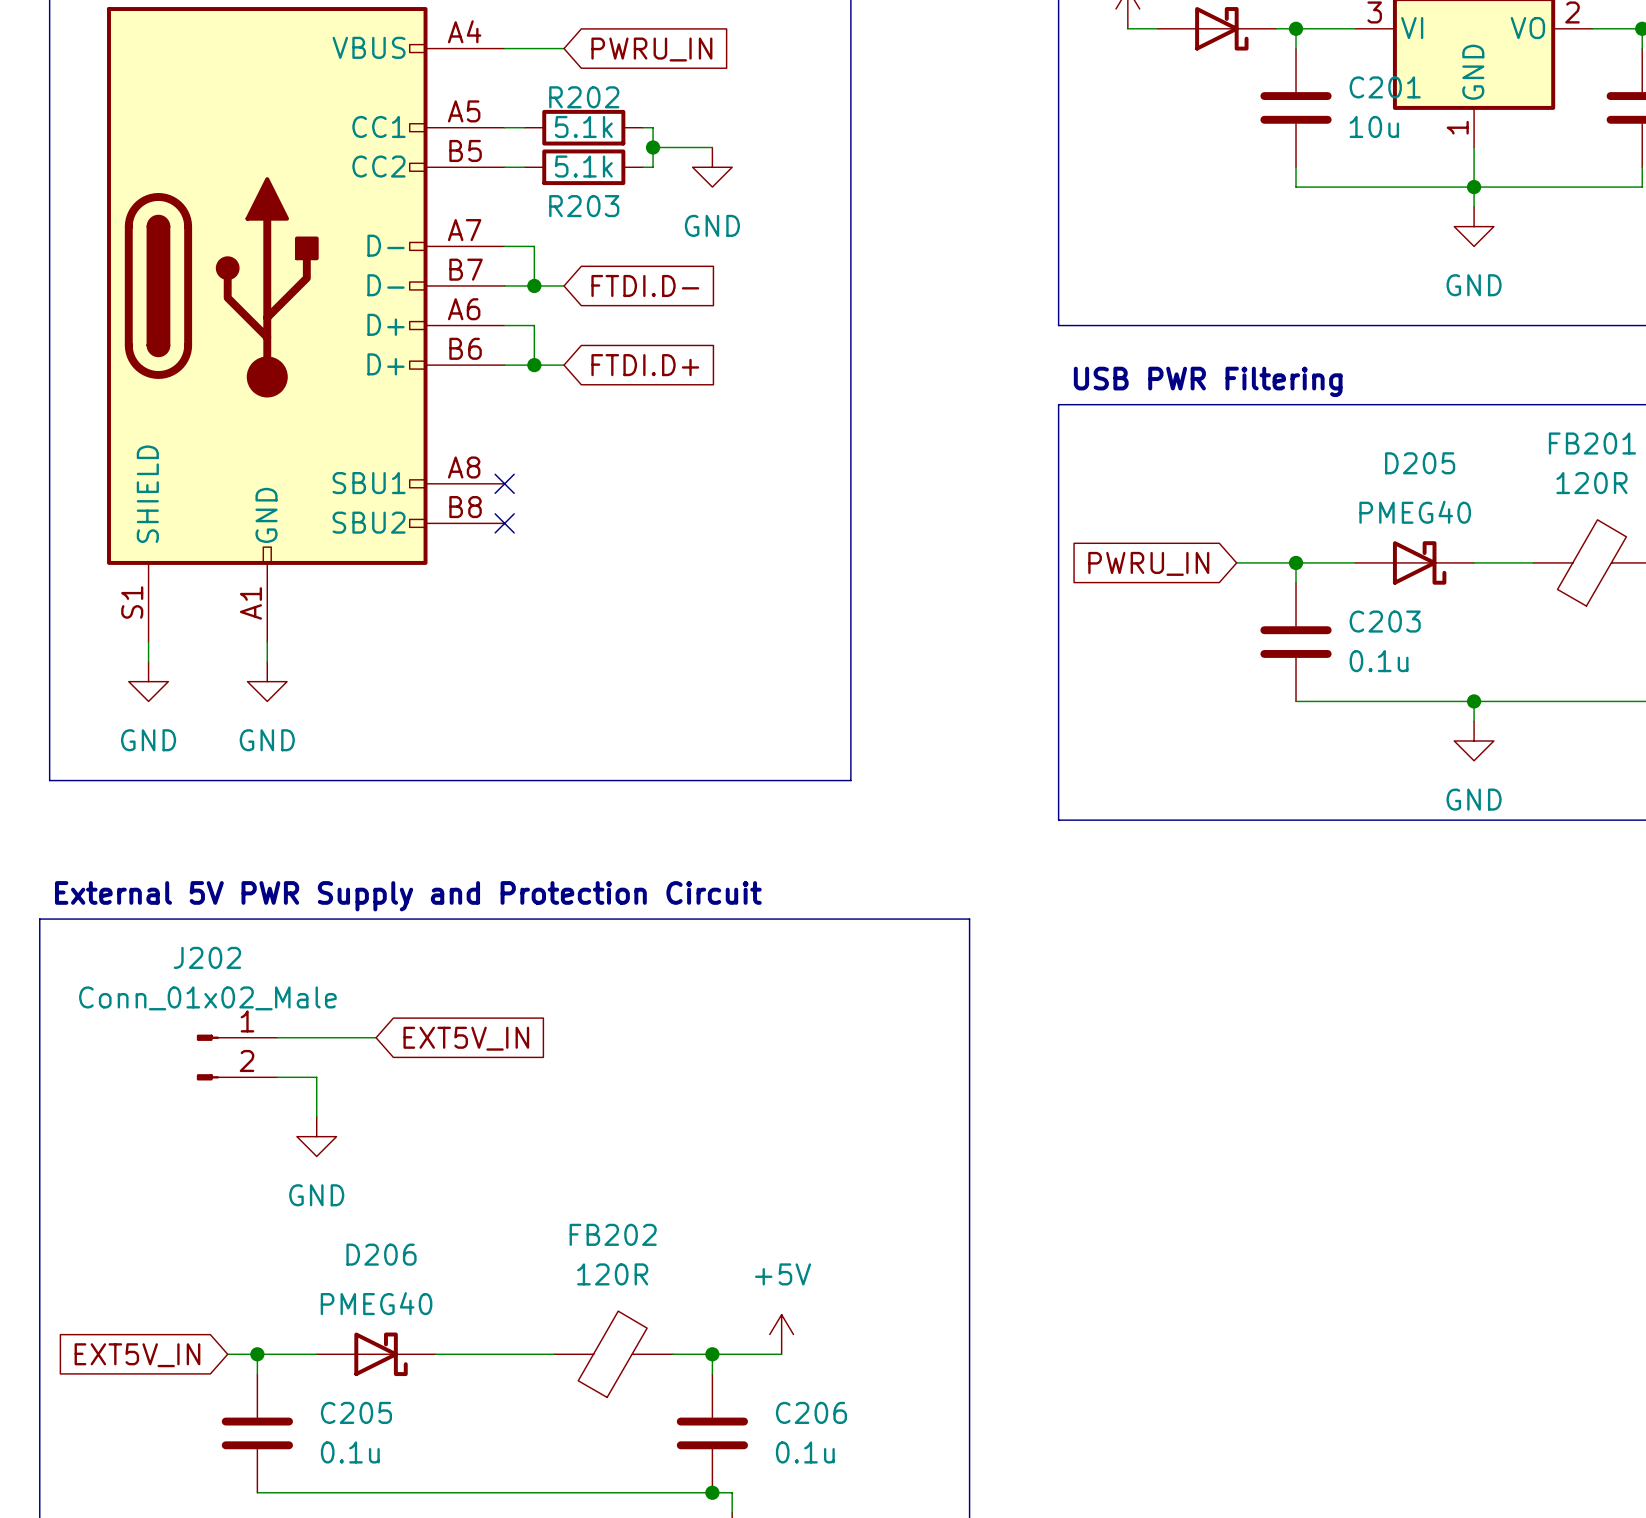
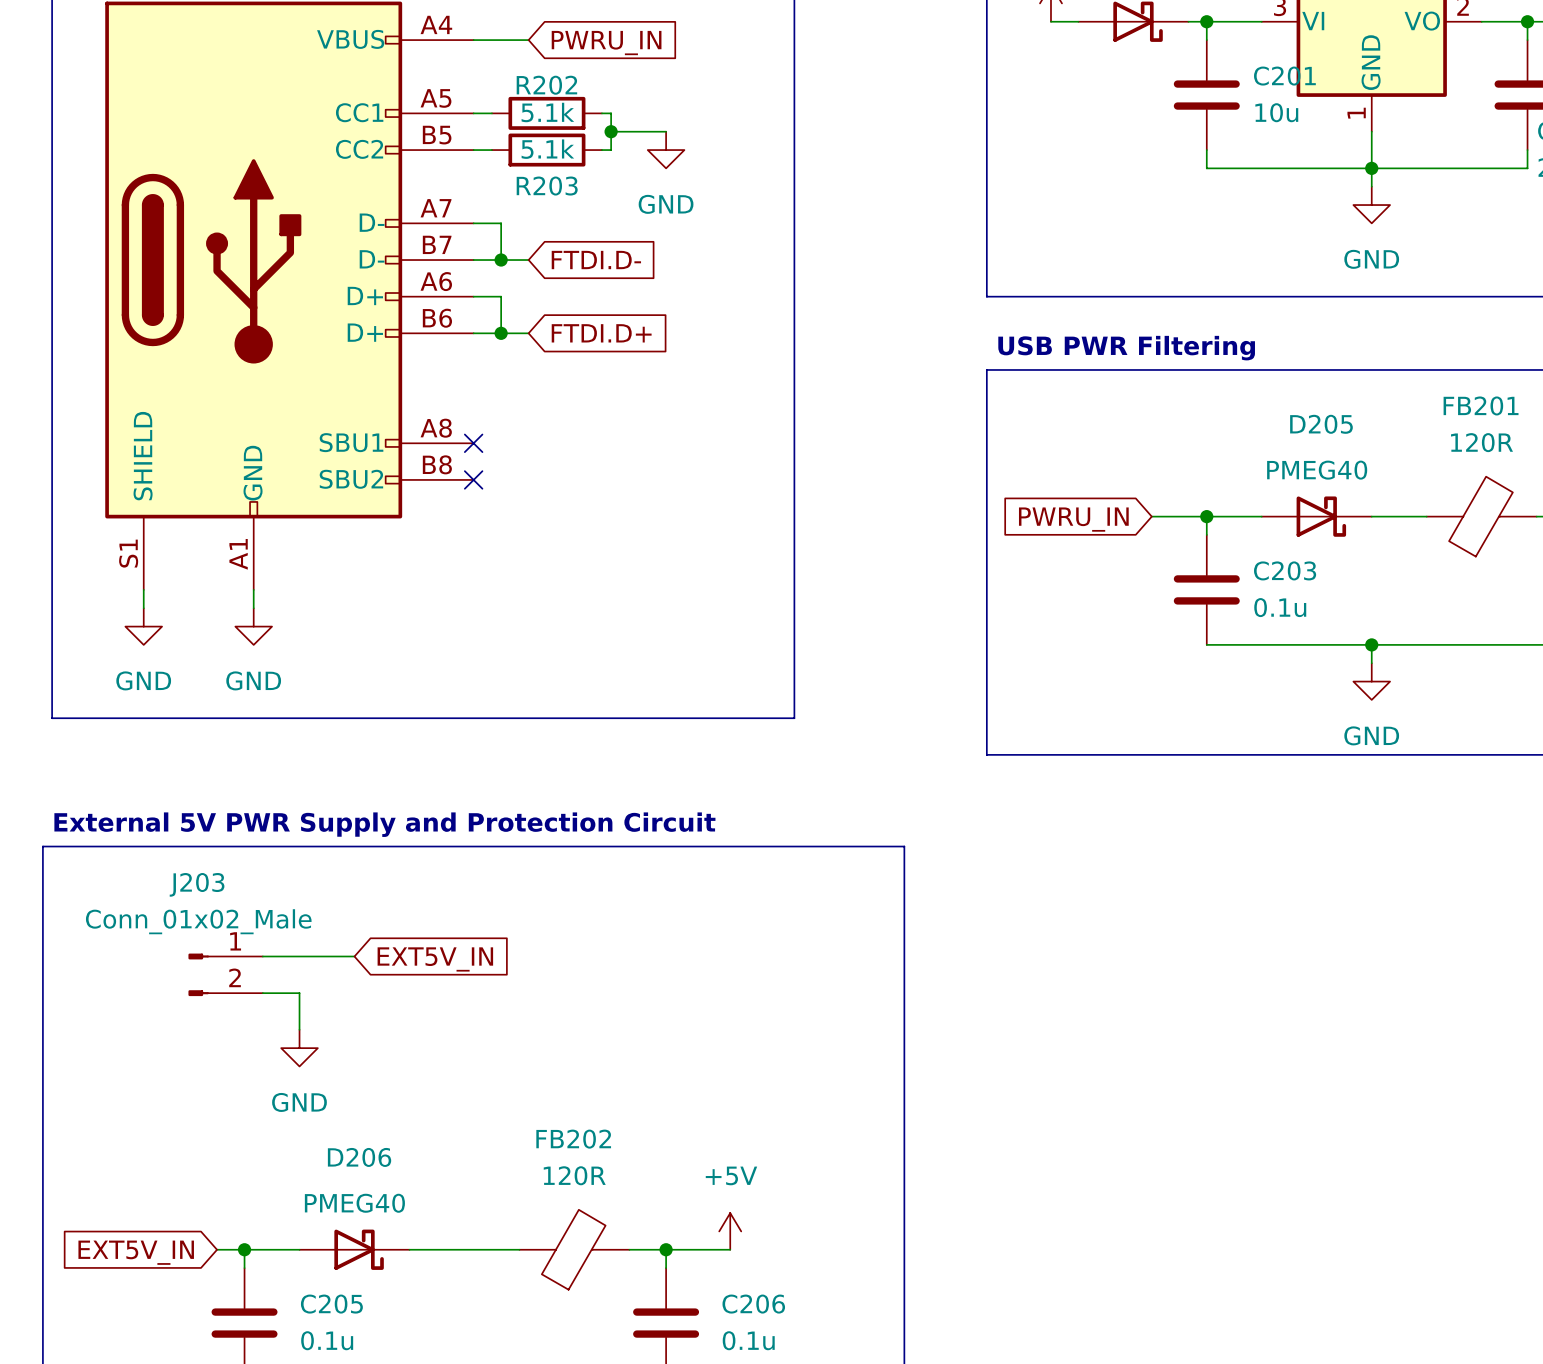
J202 name: J202 (207, 957) -> J203 (197, 884)

